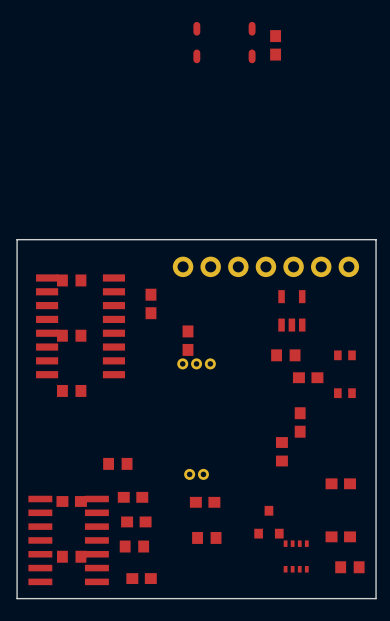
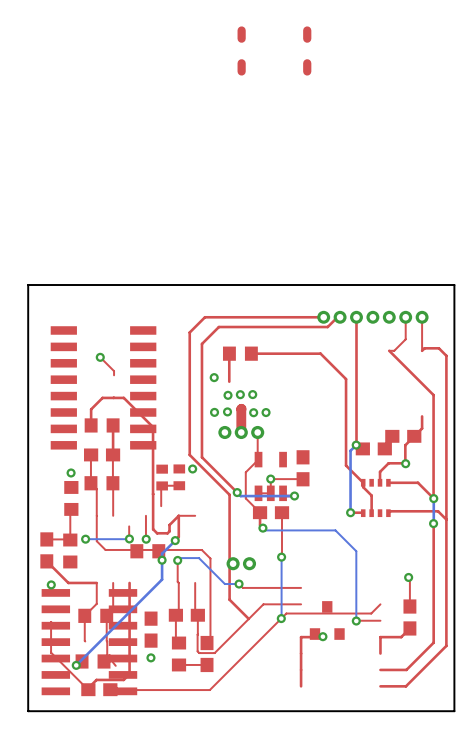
part: (275, 45) -> none
top track: none -> (323, 317) (204, 317) (189, 332) (189, 454) (229, 494) (229, 599) (248, 618)
part: (265, 266) -> none
top track: none -> (340, 317) (337, 317) (327, 327) (218, 327) (201, 343) (201, 457) (237, 492)
top track: none -> (356, 317) (356, 445)
part: none -> (372, 317)
top track: none -> (405, 317) (405, 339) (394, 350) (389, 350) (433, 395) (433, 498)
top track: none -> (422, 317) (422, 350) (424, 348) (438, 348) (446, 355) (446, 645) (405, 686) (380, 686)
part: (71, 280) -> none
top track: none -> (229, 353) (229, 381)
part: none -> (240, 353)
top track: none -> (251, 353) (320, 353) (346, 379) (346, 465) (363, 482) (363, 487) (371, 495) (371, 513)
top track: none -> (100, 357) (114, 371) (114, 375)
via: none -> (100, 357)
part: (150, 303) -> none
part position: (291, 310) -> (270, 476)
via: none -> (214, 377)
via: none -> (252, 394)
via: none -> (228, 395)
via: none -> (240, 394)
part: (71, 335) -> none
part: (188, 340) -> none
top track: none -> (241, 408) (241, 432)
via: none -> (214, 412)
via: none -> (227, 411)
via: none -> (253, 412)
via: none -> (266, 412)
top track: none -> (422, 416) (422, 428) (405, 445) (405, 463)
part: (285, 355) -> none
part: (344, 355) -> none
top track: none -> (91, 425) (91, 409) (102, 397) (123, 397) (153, 427) (153, 529) (157, 533) (167, 533) (169, 525) (178, 515)
part: none -> (102, 425)
top track: none -> (113, 425) (113, 454)
top track: none -> (257, 432) (258, 459) (245, 472) (245, 498) (260, 512) (260, 525) (262, 528)
part: none -> (403, 436)
bottom track: none -> (356, 445) (350, 450) (350, 512)
via: none -> (356, 445)
top track: none -> (90, 455) (90, 483) (96, 489) (96, 541) (105, 549) (201, 549) (210, 558) (210, 639) (207, 643)
part: none -> (102, 454)
top track: none -> (112, 455) (113, 515)
top track: none -> (405, 463) (388, 463) (380, 471) (379, 482)
part: (71, 390) -> none
via: none -> (405, 463)
part: (344, 393) -> none
via: none -> (192, 468)
part: none -> (303, 468)
via: none -> (71, 472)
part: none -> (162, 477)
part: none -> (179, 477)
via: none -> (270, 479)
top track: none -> (302, 479) (270, 479) (270, 493) (258, 493)
part: none -> (101, 483)
top track: none -> (388, 482) (417, 482) (433, 498)
part footprint: [294, 407, 306, 438] -> [360, 478, 391, 518]
top track: none -> (179, 485) (161, 486) (161, 506)
bottom track: none -> (237, 492) (240, 496) (294, 496)
via: none -> (237, 492)
via: none -> (294, 496)
part: none -> (71, 498)
bottom track: none -> (433, 498) (433, 523)
via: none -> (433, 498)
top track: none -> (71, 509) (70, 540) (46, 539)
part: none -> (271, 512)
top track: none -> (282, 512) (281, 557)
top track: none -> (350, 512) (363, 513)
via: none -> (350, 512)
top track: none -> (388, 513) (390, 511) (438, 511) (446, 519)
top track: none -> (145, 515) (146, 539)
top track: none -> (178, 515) (178, 537) (175, 540)
top track: none -> (195, 515) (178, 515)
top track: none -> (433, 523) (433, 642) (406, 669) (380, 669)
via: none -> (433, 523)
top track: none -> (129, 526) (129, 538)
bottom track: none -> (262, 528) (265, 530) (335, 530) (356, 551) (356, 621)
via: none -> (262, 528)
part: (281, 451) -> none
via: none -> (85, 539)
bottom track: none -> (129, 538) (85, 539)
via: none -> (129, 538)
via: none -> (146, 539)
bottom track: none -> (175, 540) (162, 553) (162, 579) (76, 665)
via: none -> (175, 540)
part: none -> (46, 550)
part: none -> (70, 550)
bottom track: none -> (281, 557) (281, 618)
via: none -> (281, 557)
via: none -> (162, 560)
top track: none -> (177, 560) (178, 612) (175, 615) (175, 639) (179, 643)
bottom track: none -> (177, 560) (180, 558) (198, 558) (224, 584) (239, 584)
via: none -> (177, 560)
top track: none -> (46, 561) (68, 582) (96, 582) (96, 603) (84, 615) (85, 641)
part: (340, 483) -> none
top track: none -> (408, 577) (409, 606)
via: none -> (408, 577)
top track: none -> (113, 582) (113, 609) (106, 615) (106, 640) (107, 655) (115, 665)
top track: none -> (129, 582) (129, 674) (123, 679) (96, 679) (87, 689) (51, 652) (51, 621)
top track: none -> (195, 582) (195, 612) (197, 615) (197, 651) (199, 653) (214, 653) (263, 604) (301, 604)
top track: none -> (239, 584) (242, 587) (301, 587)
via: none -> (239, 584)
via: none -> (51, 584)
part: (133, 497) -> none
part: (71, 501) -> none
part: (205, 502) -> none
top track: none -> (380, 604) (371, 613) (286, 613) (209, 690) (110, 689)
part: none -> (186, 615)
part: none -> (95, 615)
via: none -> (281, 618)
part: (136, 521) -> none
via: none -> (356, 621)
top track: none -> (380, 620) (356, 621)
top track: none -> (409, 628) (401, 637) (380, 637) (380, 653)
part: none -> (151, 629)
top track: none -> (322, 636) (301, 637) (301, 686)
via: none -> (322, 636)
part rotation: 0° (340, 536) -> 90° clockwise (409, 617)
part: (206, 537) -> none
part rotation: 0° (134, 546) -> 90° clockwise (179, 654)
part: none -> (207, 654)
via: none -> (150, 657)
part: (296, 556) -> none
top track: none -> (207, 664) (179, 664)
via: none -> (76, 665)
part: (349, 567) -> none
part: (141, 578) -> none
part: none -> (99, 689)

